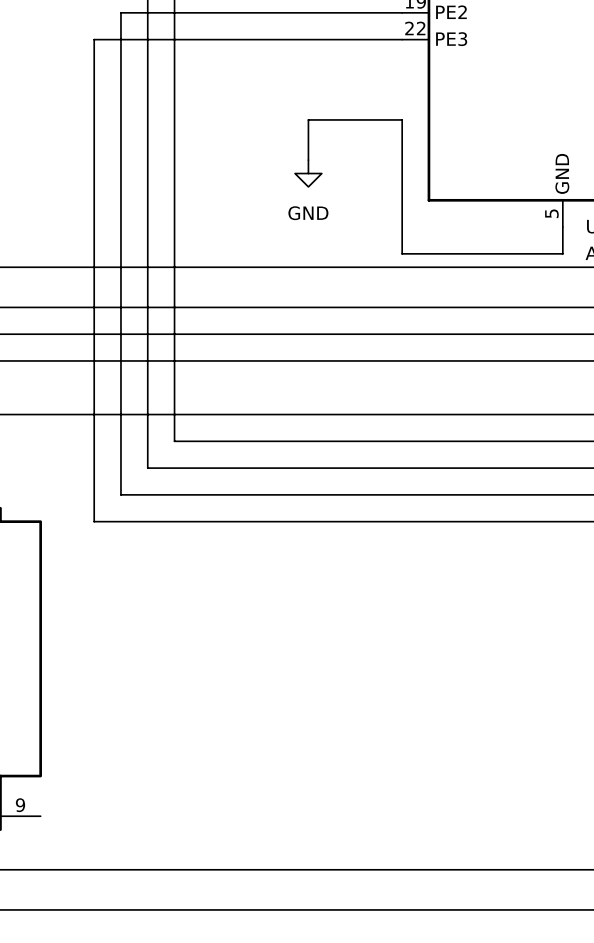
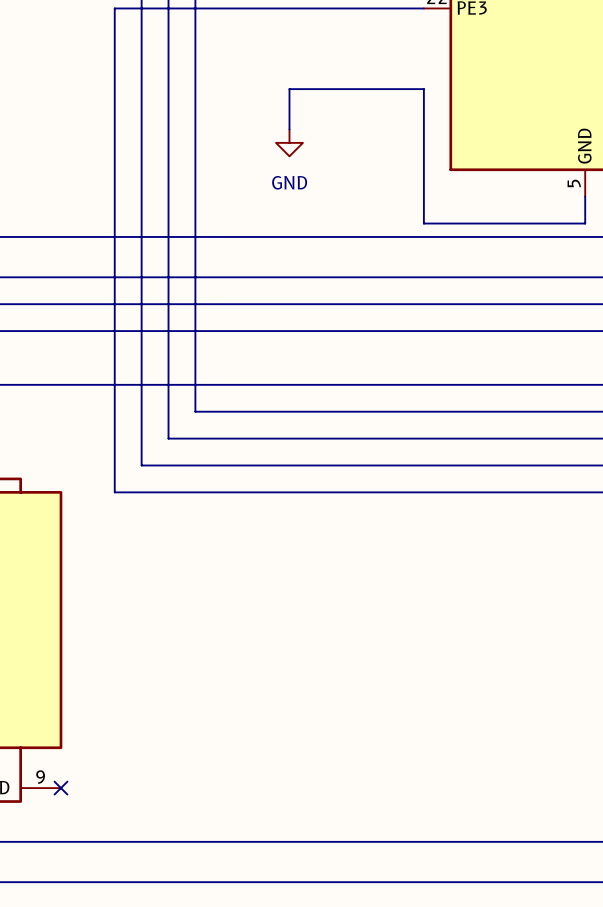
wire: (308, 119) (308, 160) -> (329, 89) (289, 89) (289, 129)
power symbol position: GND (308, 173) -> GND (289, 142)
no-connect mark: none -> (60, 788)

